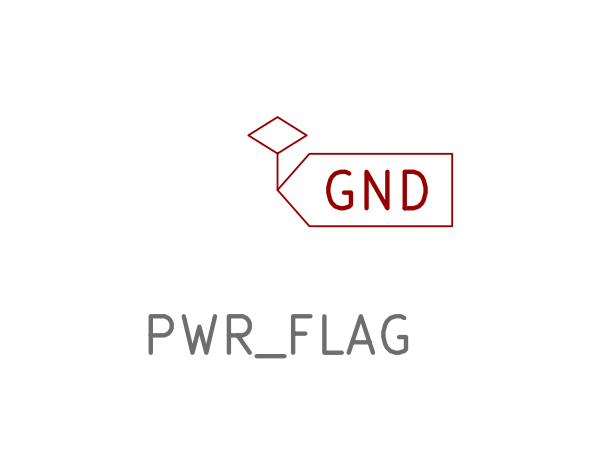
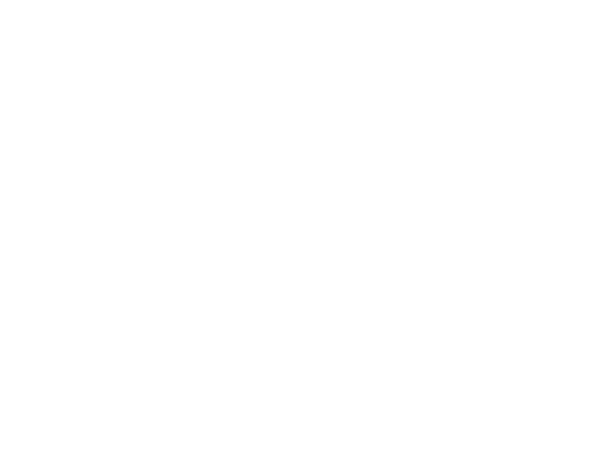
power symbol: PWR_FLAG (277, 153) -> none
global label: GND (376, 190) -> none

